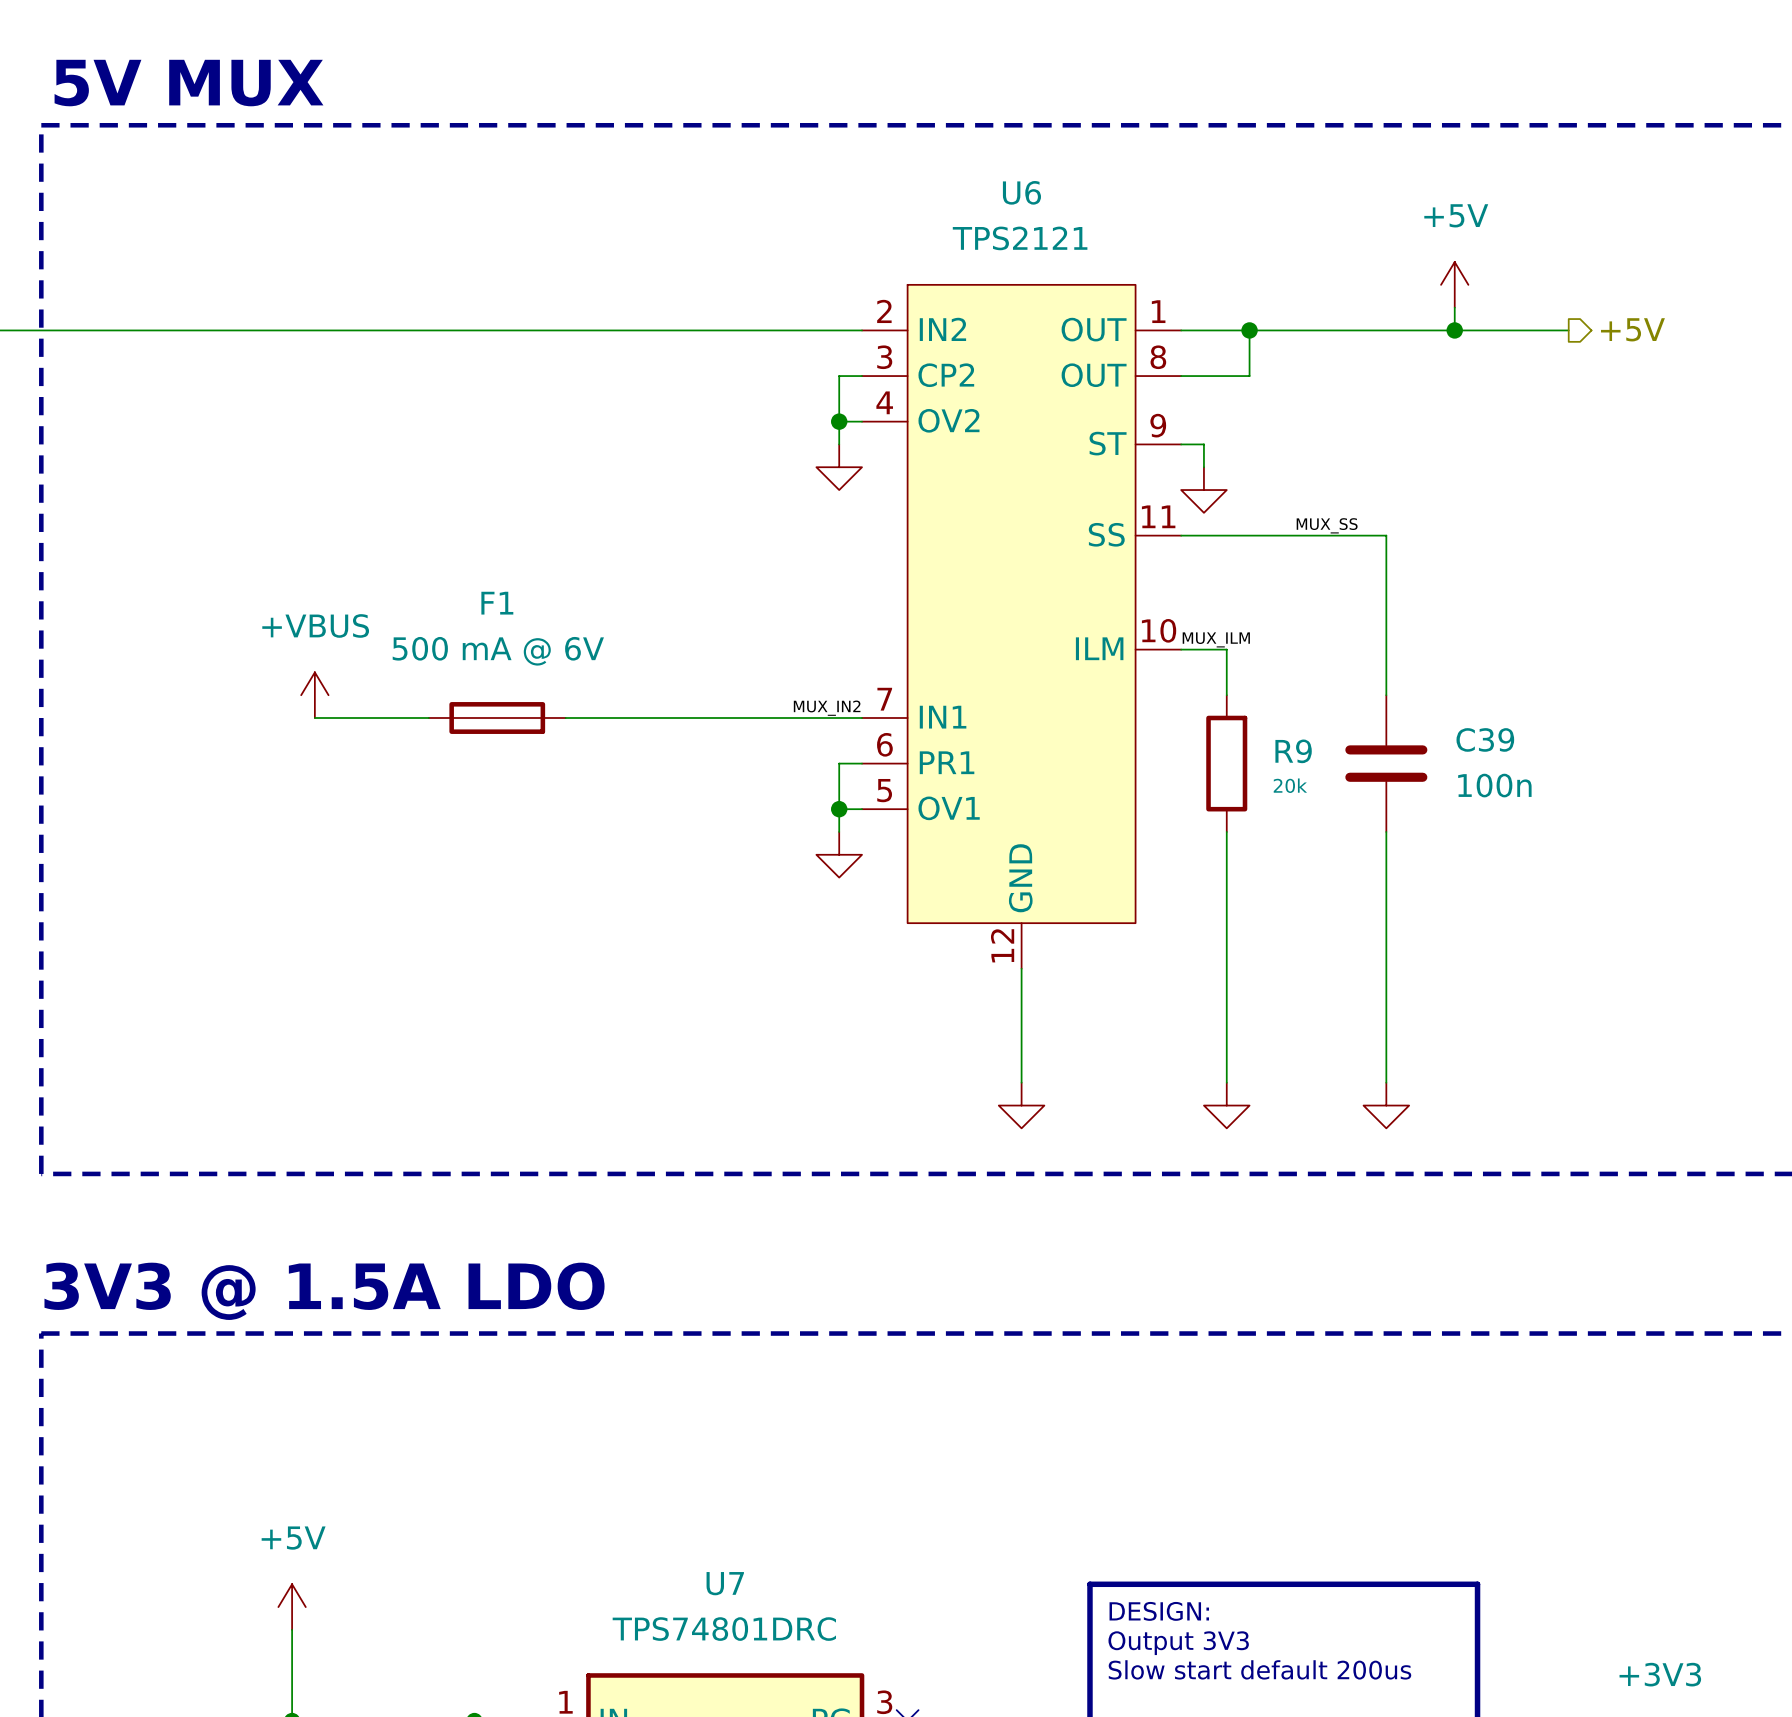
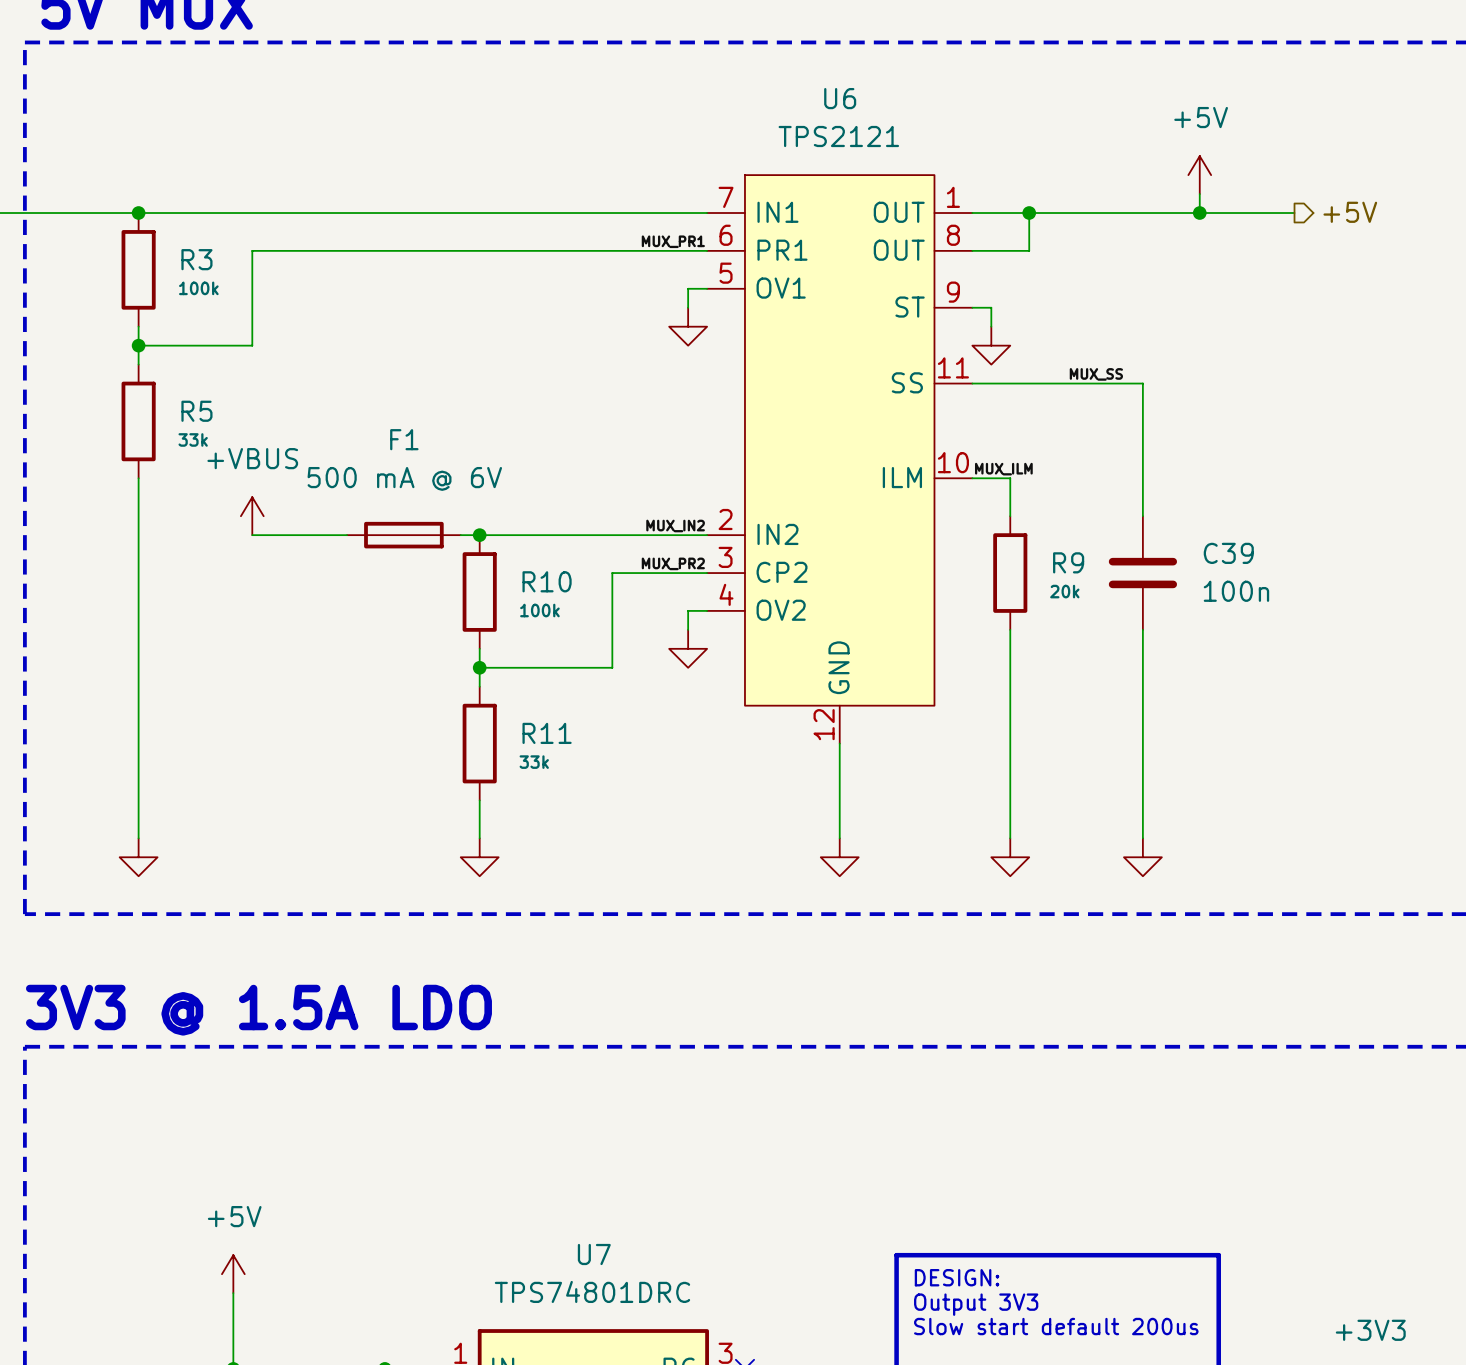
U6 symbol: [862, 284, 1182, 969] -> [707, 175, 973, 744]
junction: none -> (138, 213)
label: none -> MUX_PR1 (673, 241)
wire: (839, 376) (839, 421) -> (688, 250) (252, 250) (252, 345) (138, 345)
R3: none -> 100k (138, 269)
junction: (839, 421) -> none
wire: none -> (138, 326) (138, 364)
junction: none -> (138, 345)
R5: none -> 33k (138, 421)
wire: none -> (138, 478) (138, 838)
junction: none -> (479, 535)
label: none -> MUX_PR2 (673, 563)
wire: (839, 763) (839, 809) -> (688, 573) (612, 573) (612, 667) (479, 667)
R10: none -> 100k (479, 591)
junction: (839, 809) -> none
wire: none -> (479, 648) (479, 686)
junction: none -> (479, 667)
R11: none -> 33k (479, 743)
wire: none -> (479, 800) (479, 838)
power symbol: none -> (138, 857)
power symbol: none -> (479, 857)

